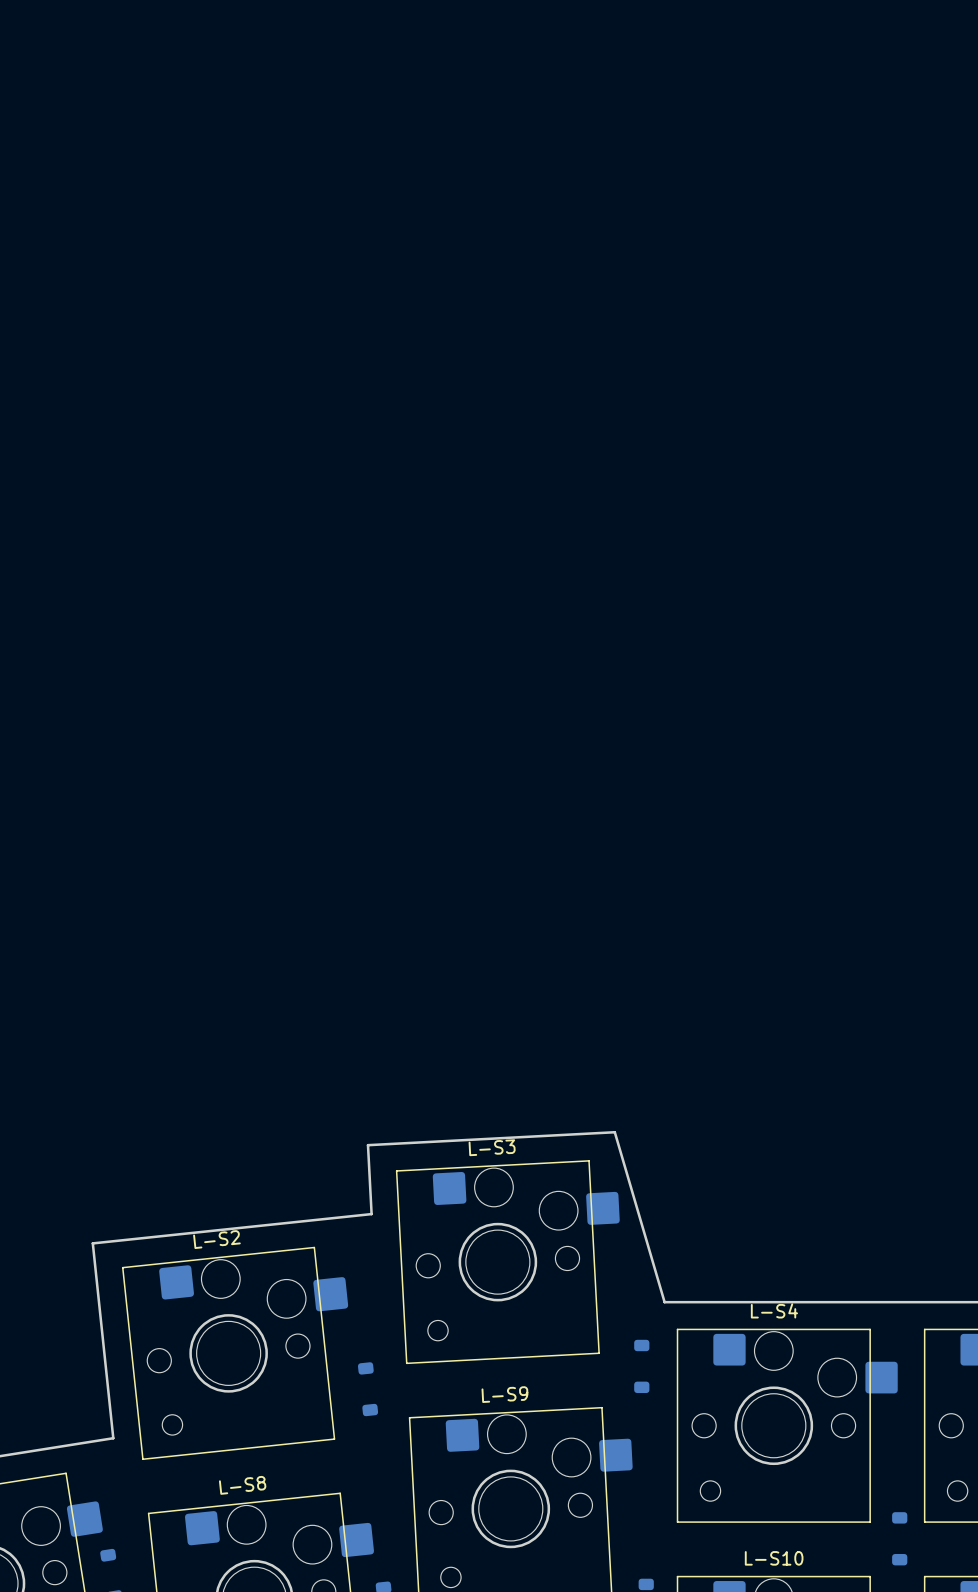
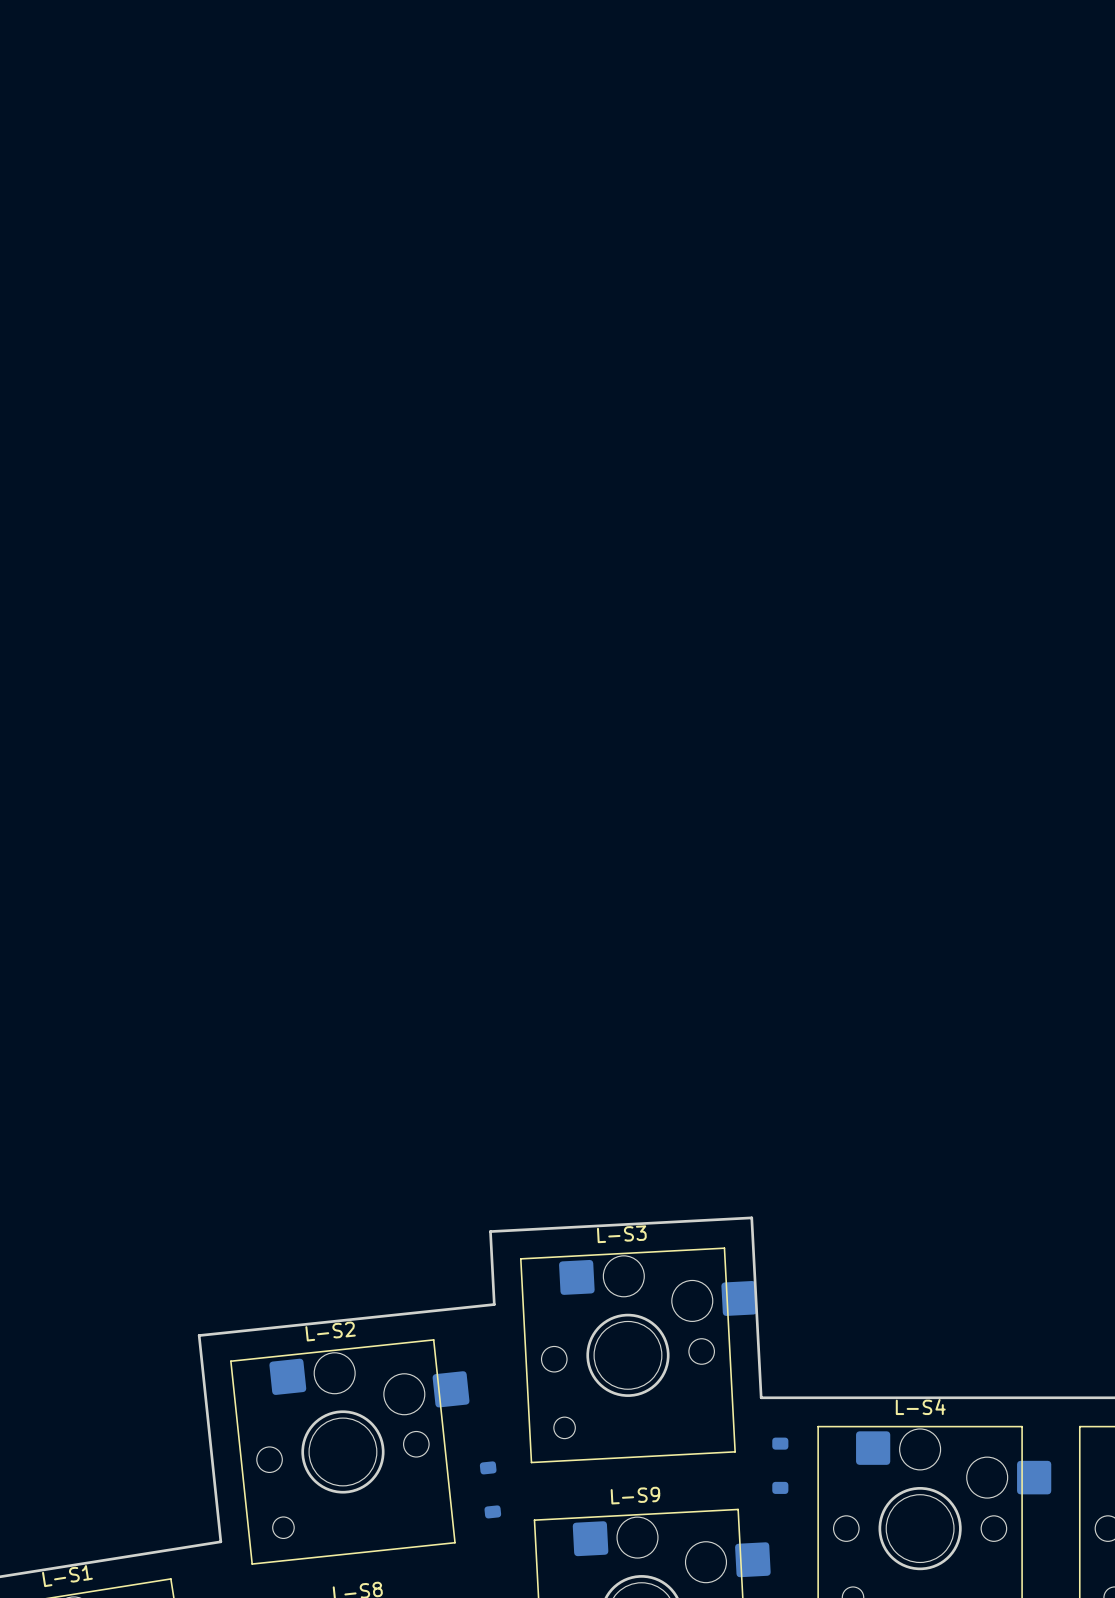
board edge: (614, 1132) (664, 1302) -> (751, 1217) (761, 1397) (804, 1397)

